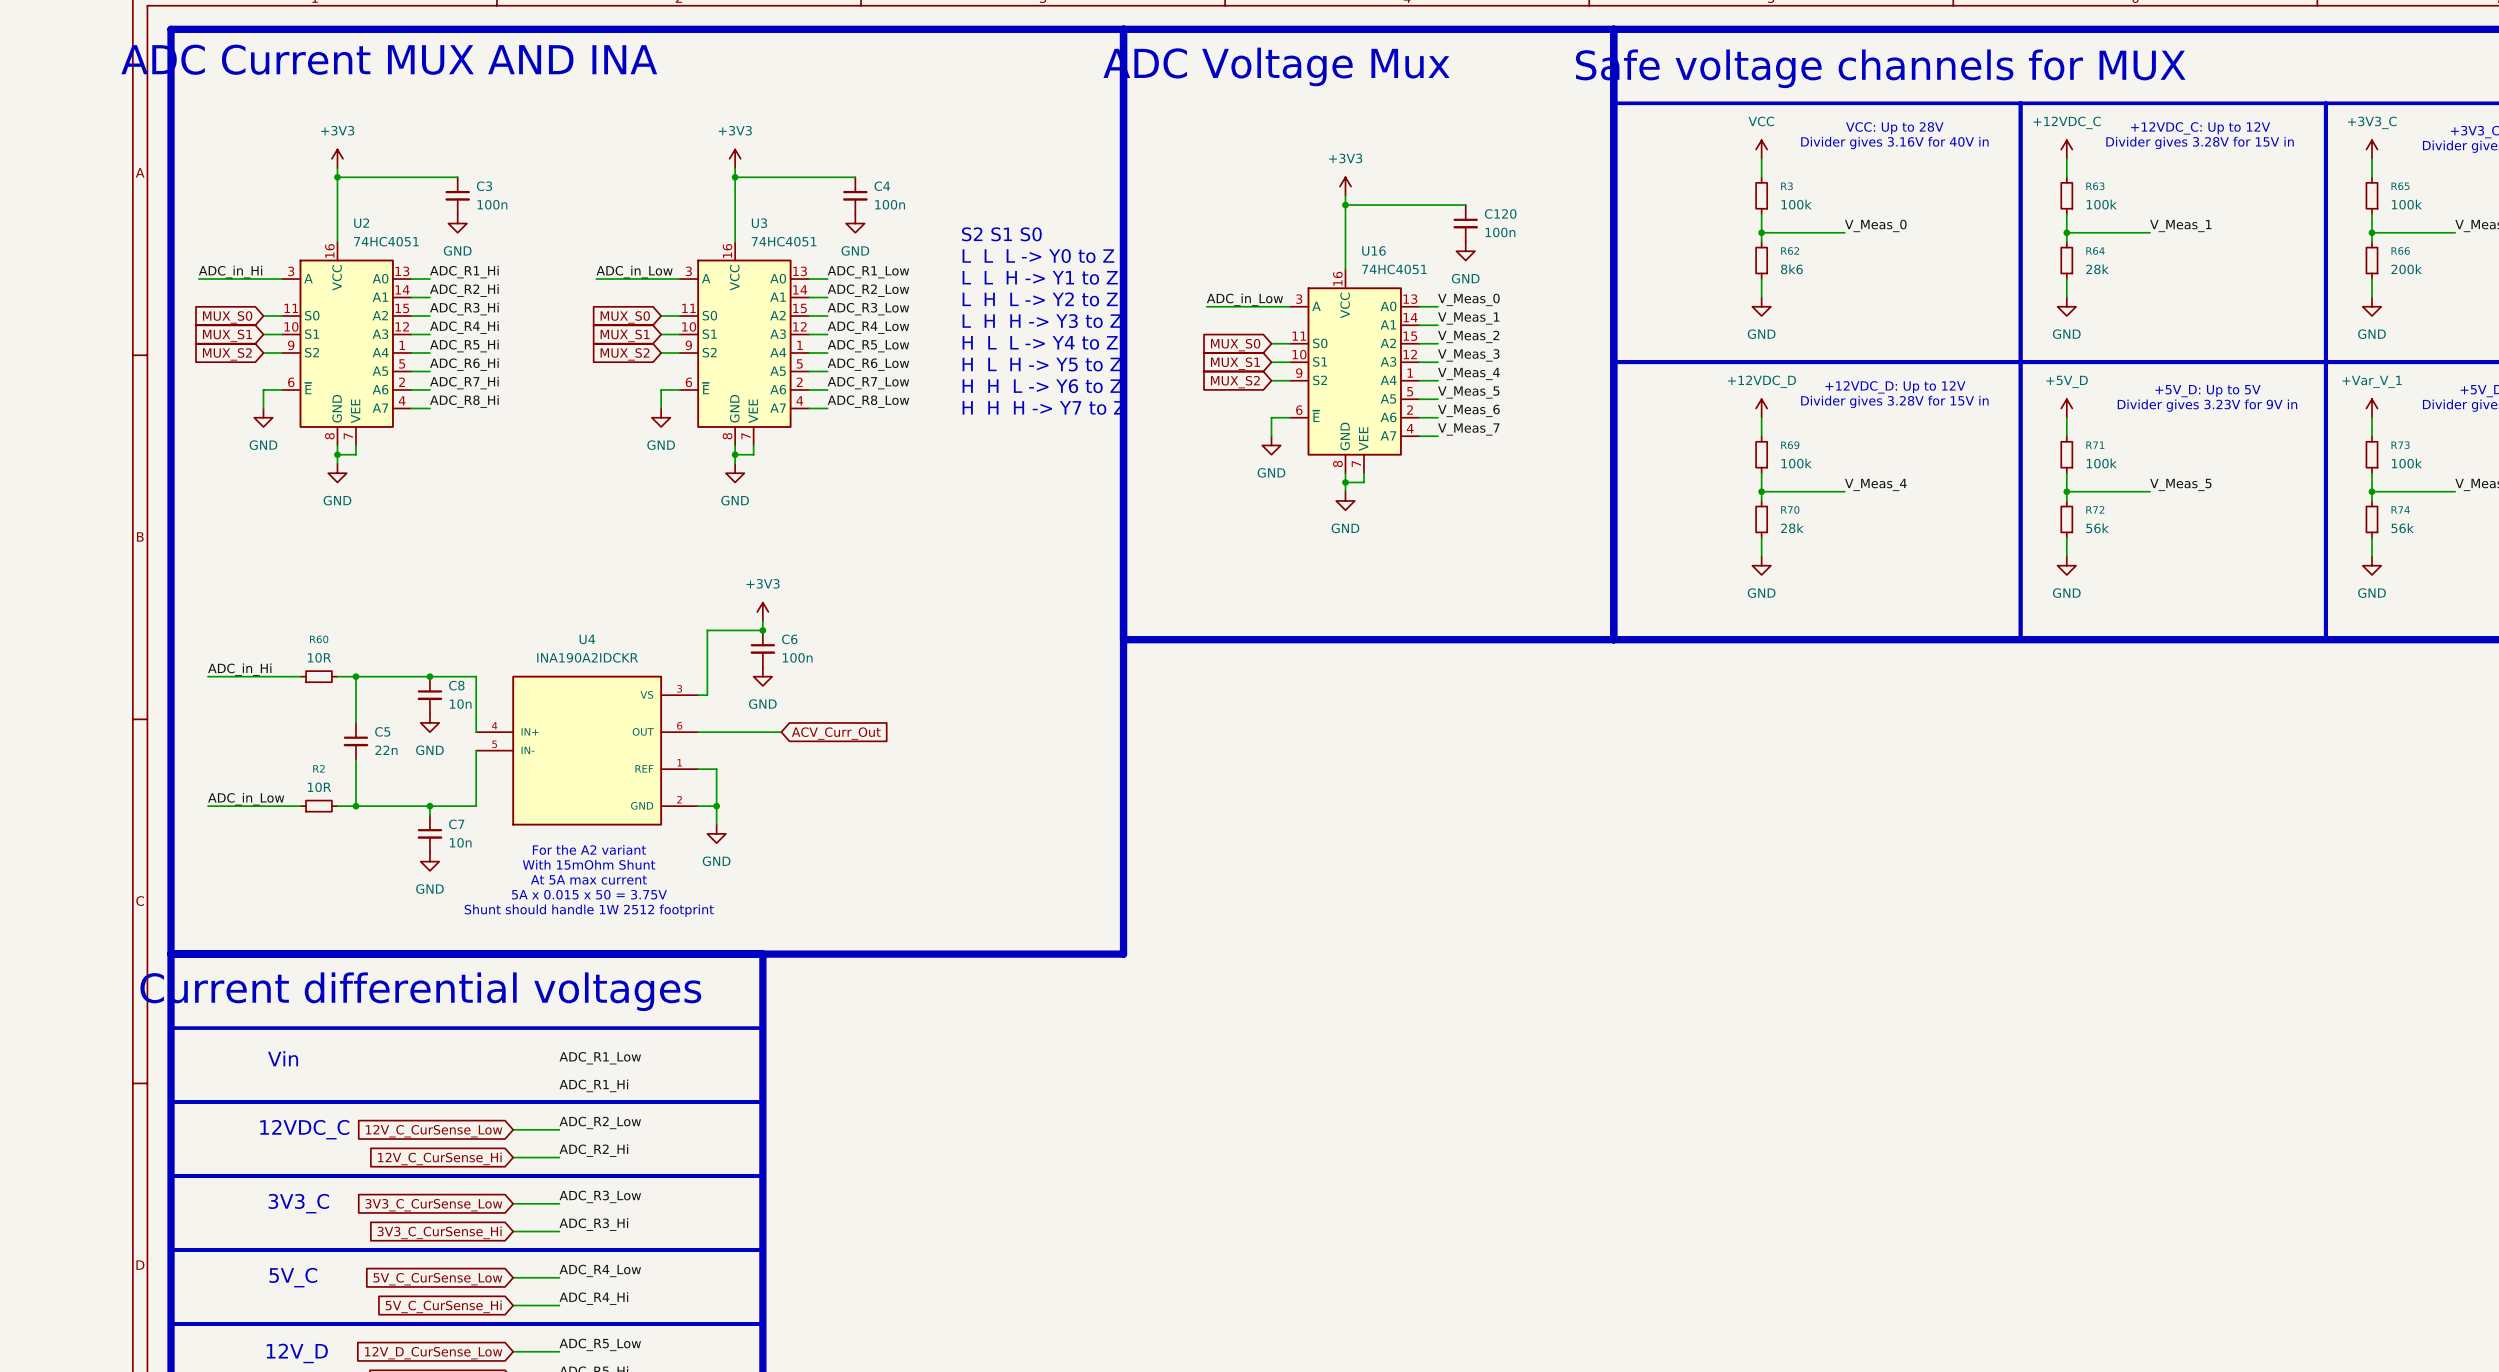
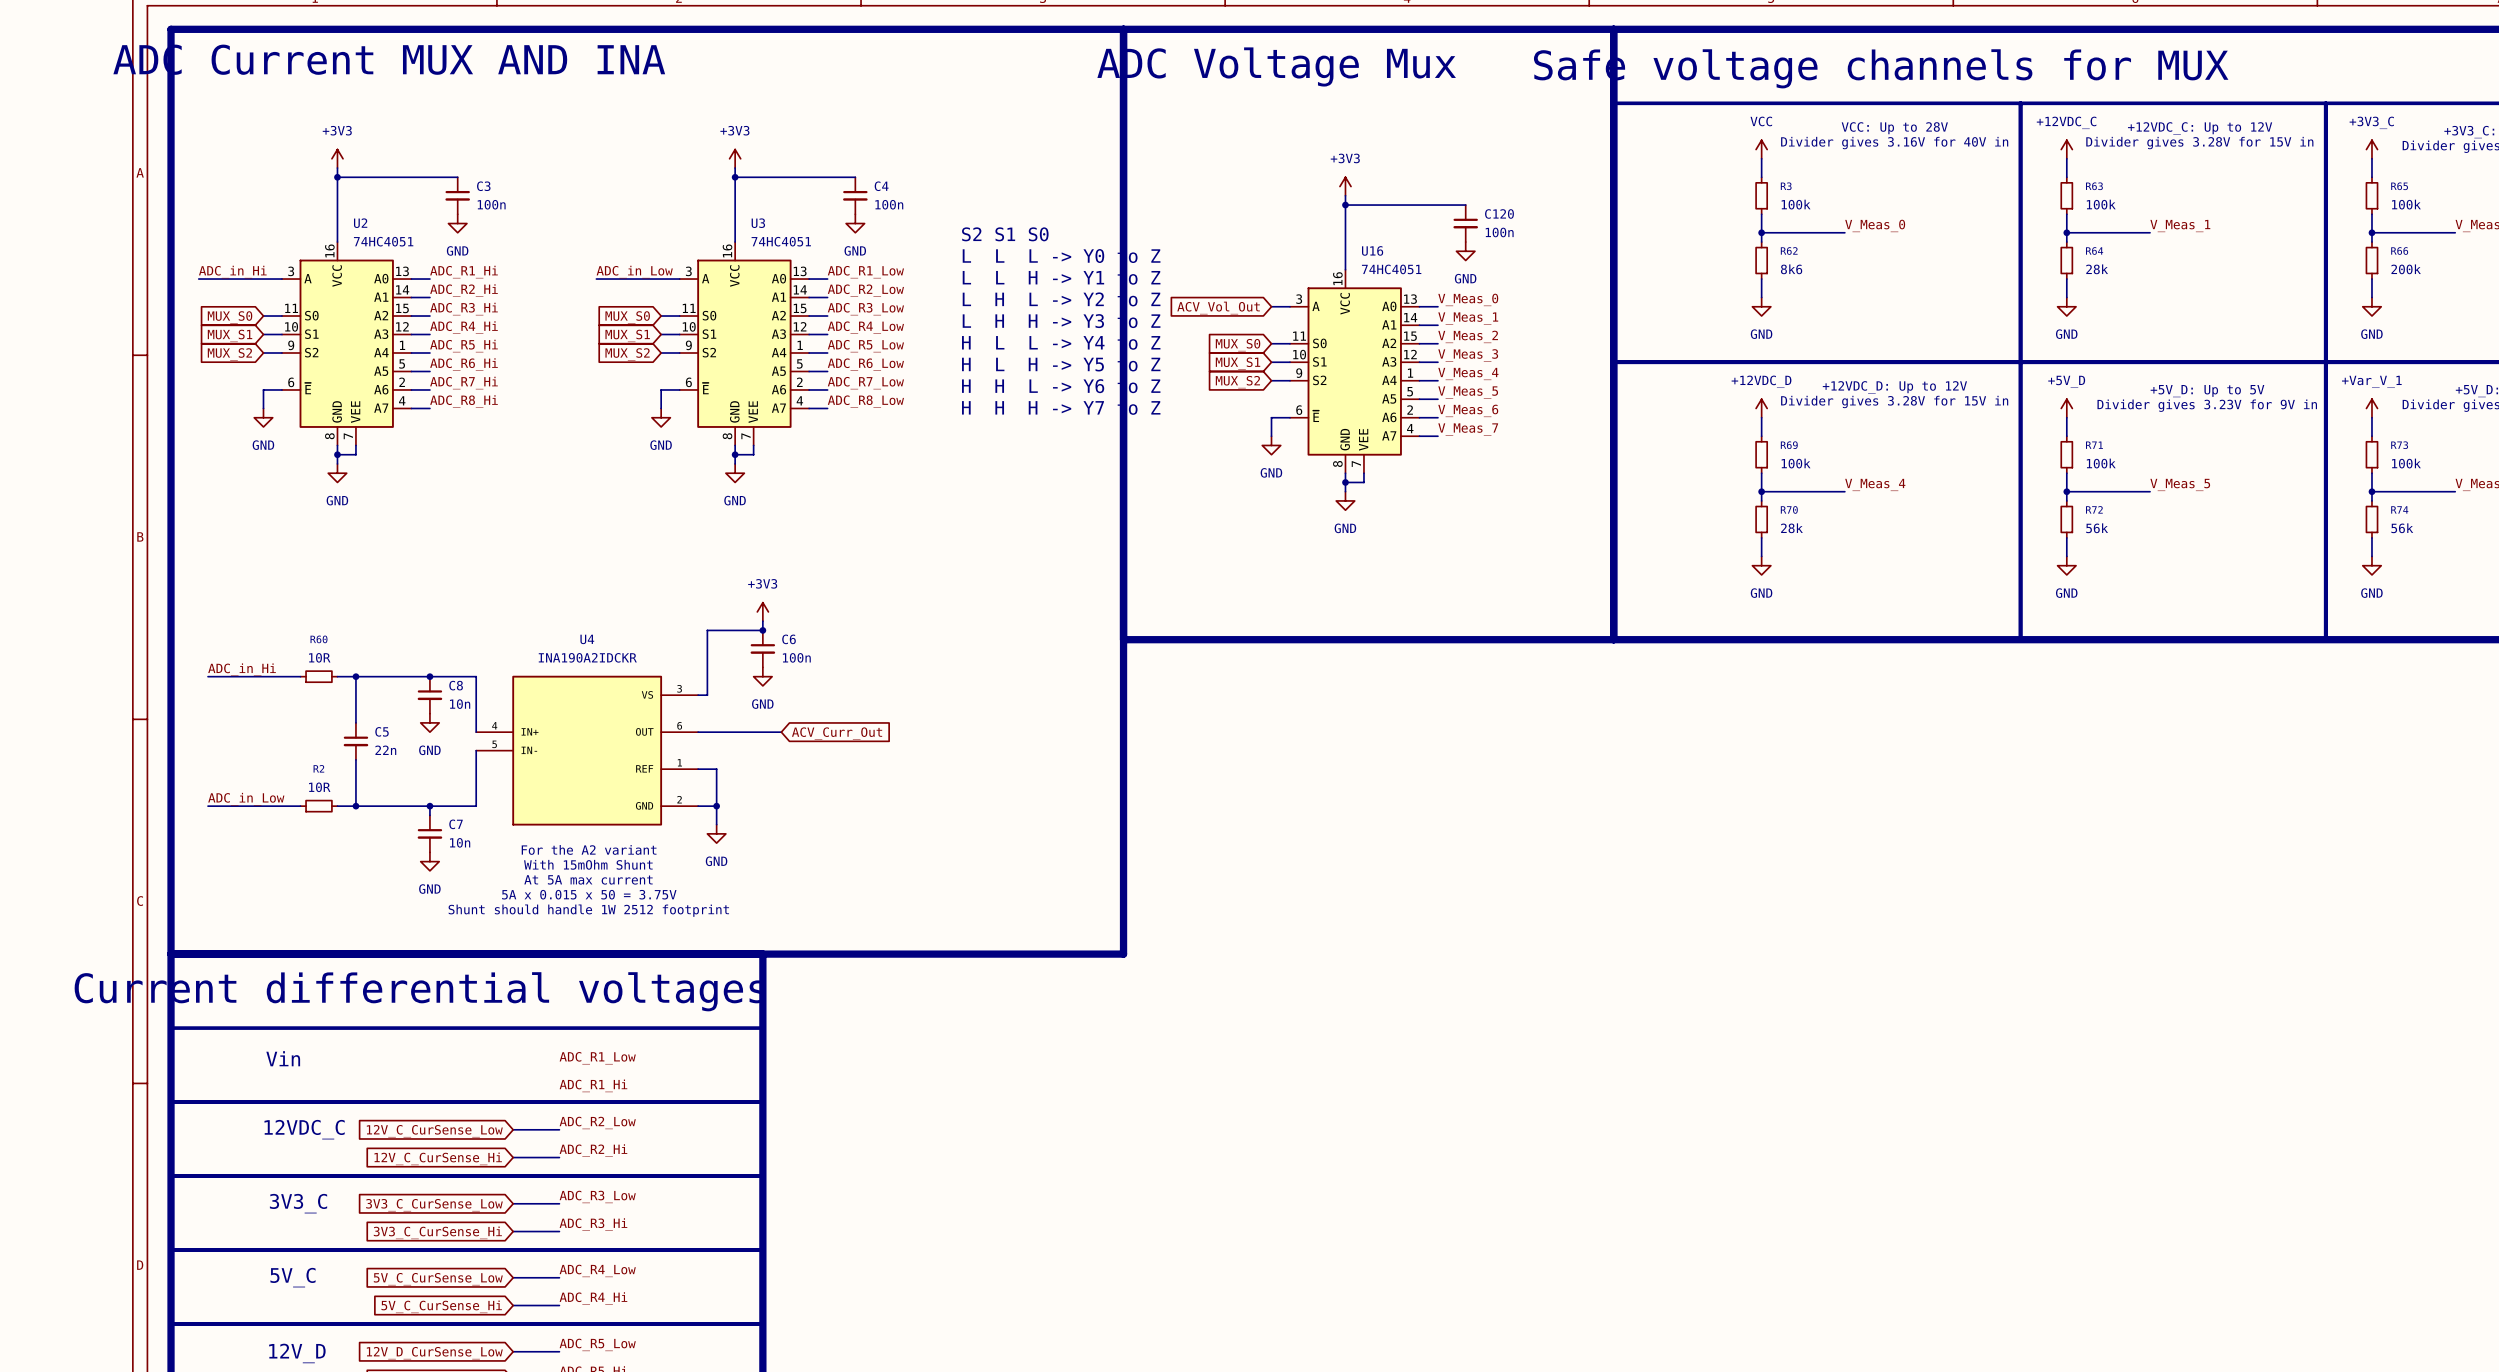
label: ADC_in_Low (1244, 299) -> none
wire: (1206, 306) (1271, 306) -> none
global label: none -> ACV_Vol_Out (1218, 308)

